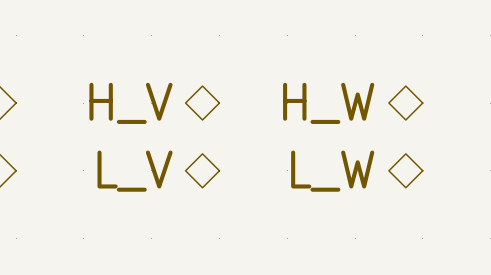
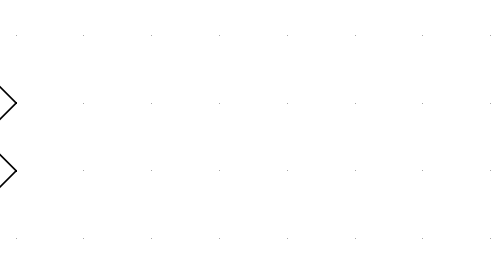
hierarchical label: H_V (130, 103) -> none
hierarchical label: H_W (328, 103) -> none
hierarchical label: L_V (135, 171) -> none
hierarchical label: L_W (332, 171) -> none

